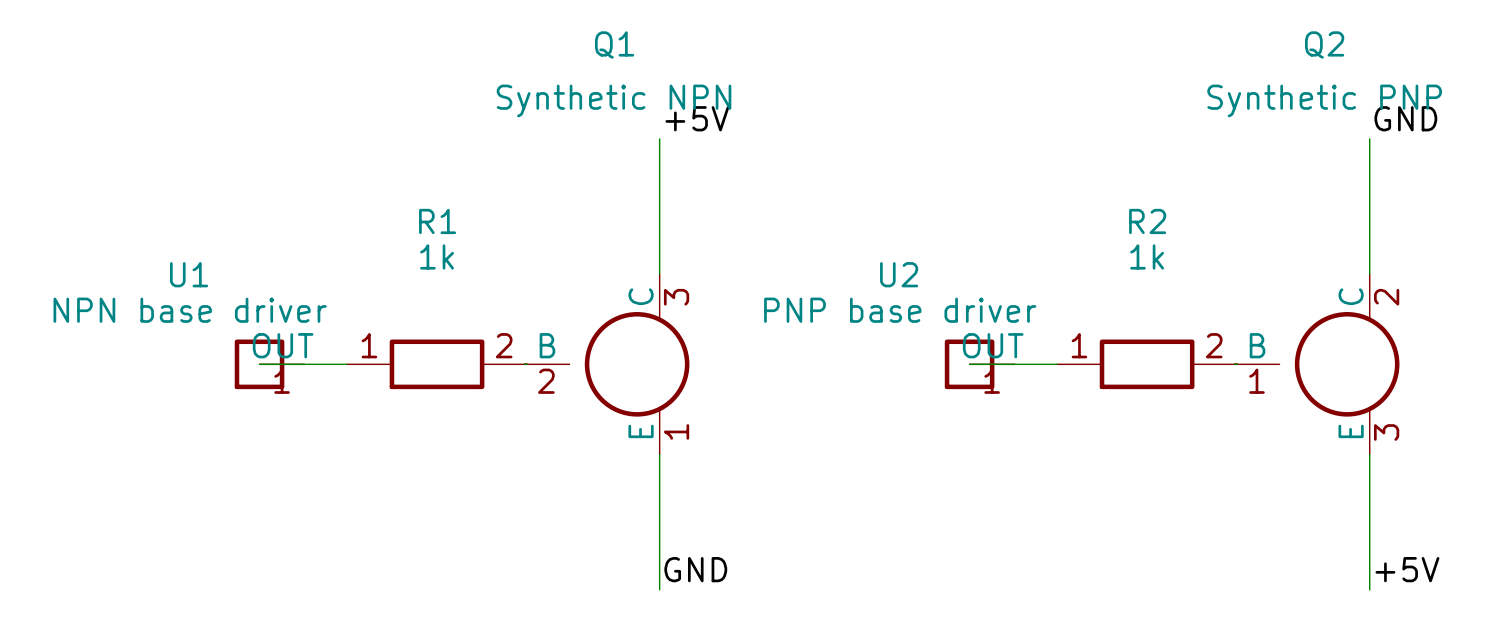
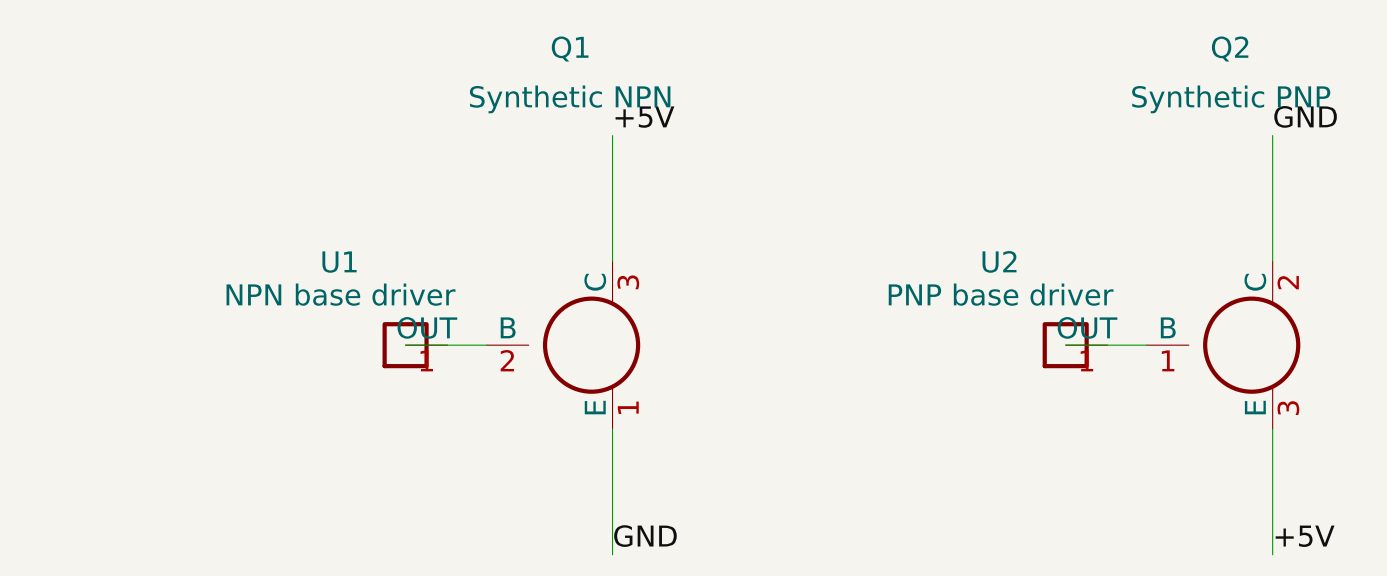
wire: (259, 364) (346, 364) -> none
U1 position: (269, 364) -> (415, 345)
R1: 1k (437, 364) -> none
wire: (969, 364) (1056, 364) -> none
U2 position: (979, 364) -> (1075, 345)
R2: 1k (1147, 364) -> none

